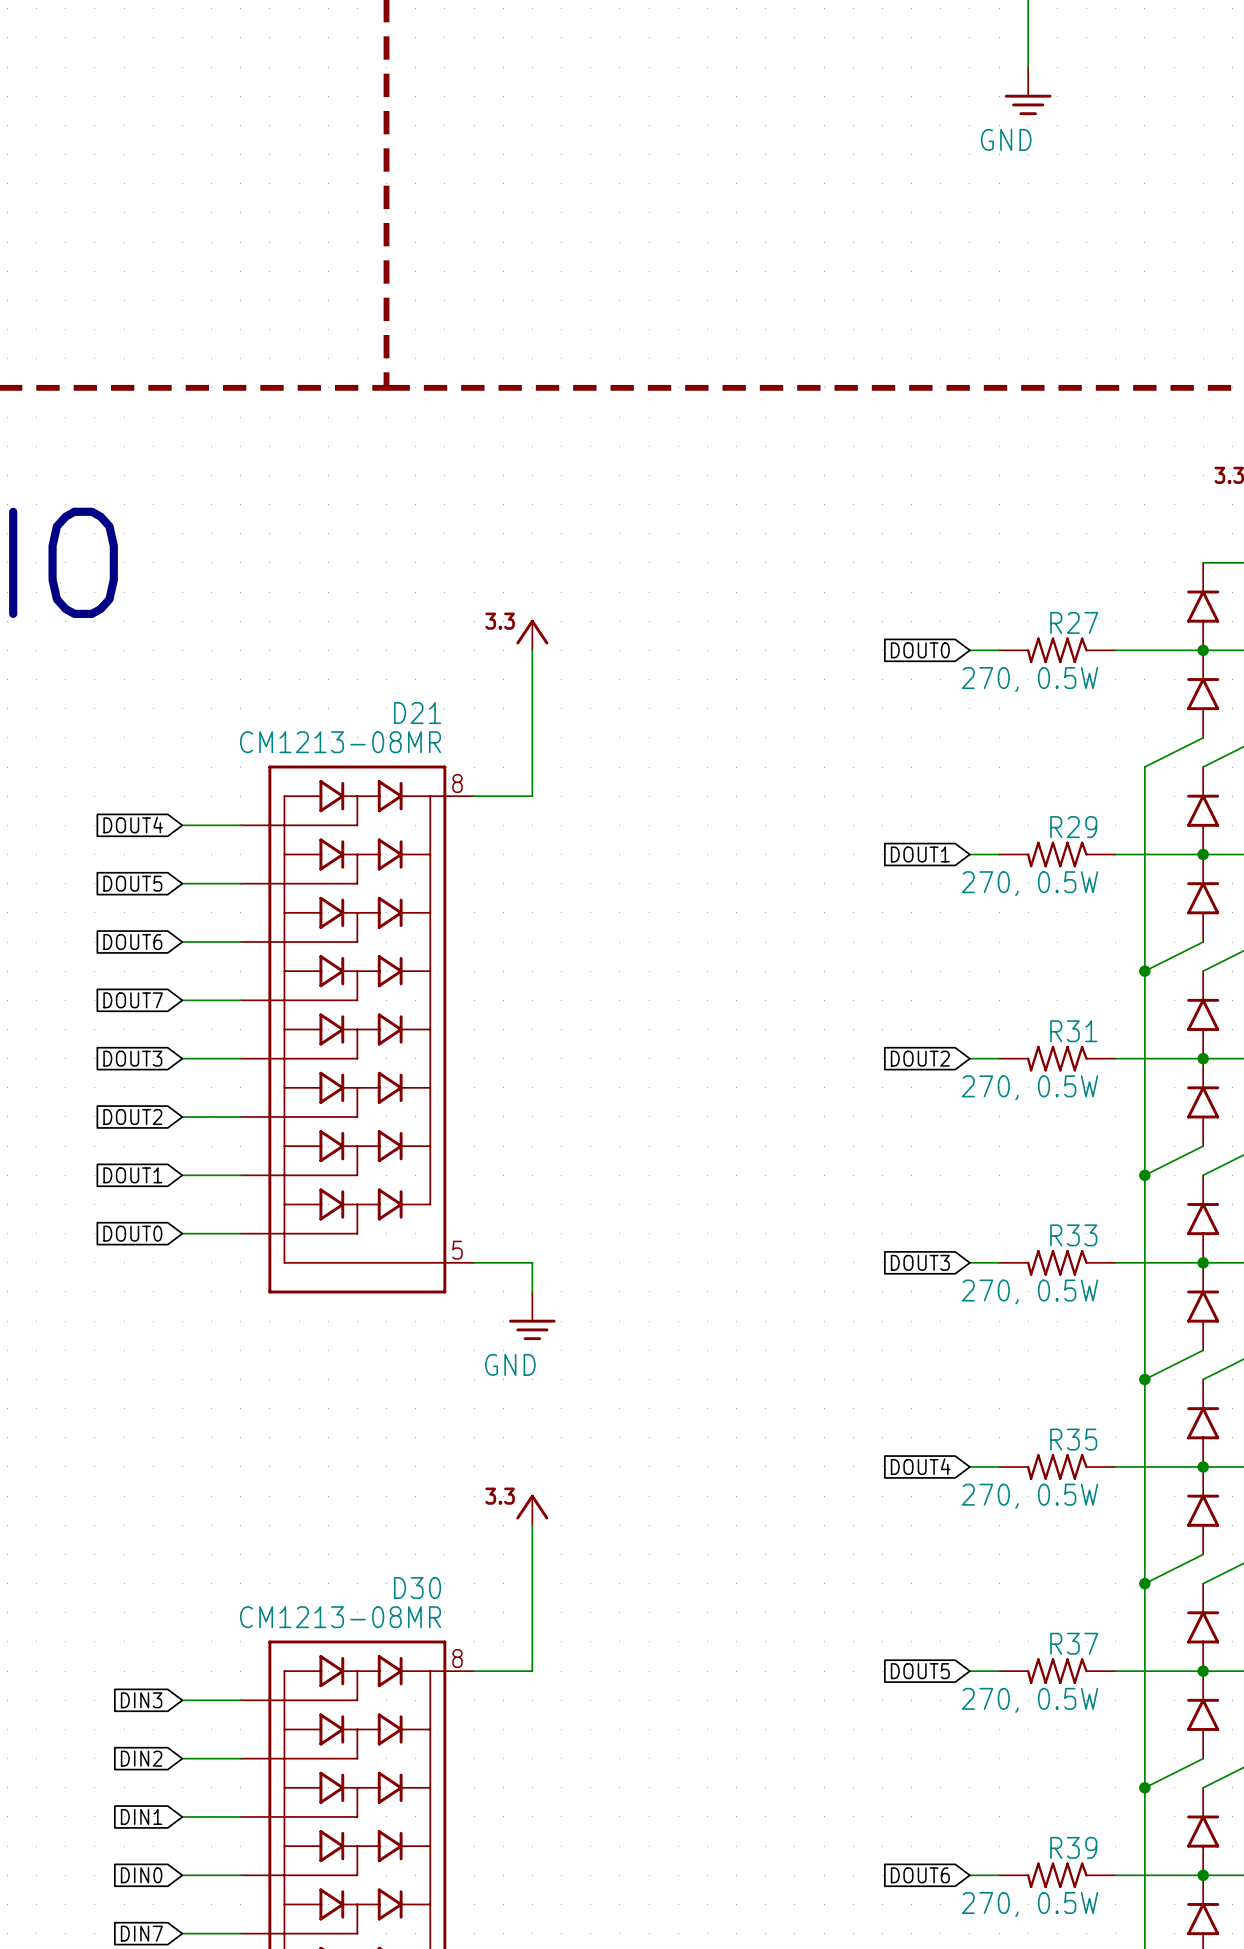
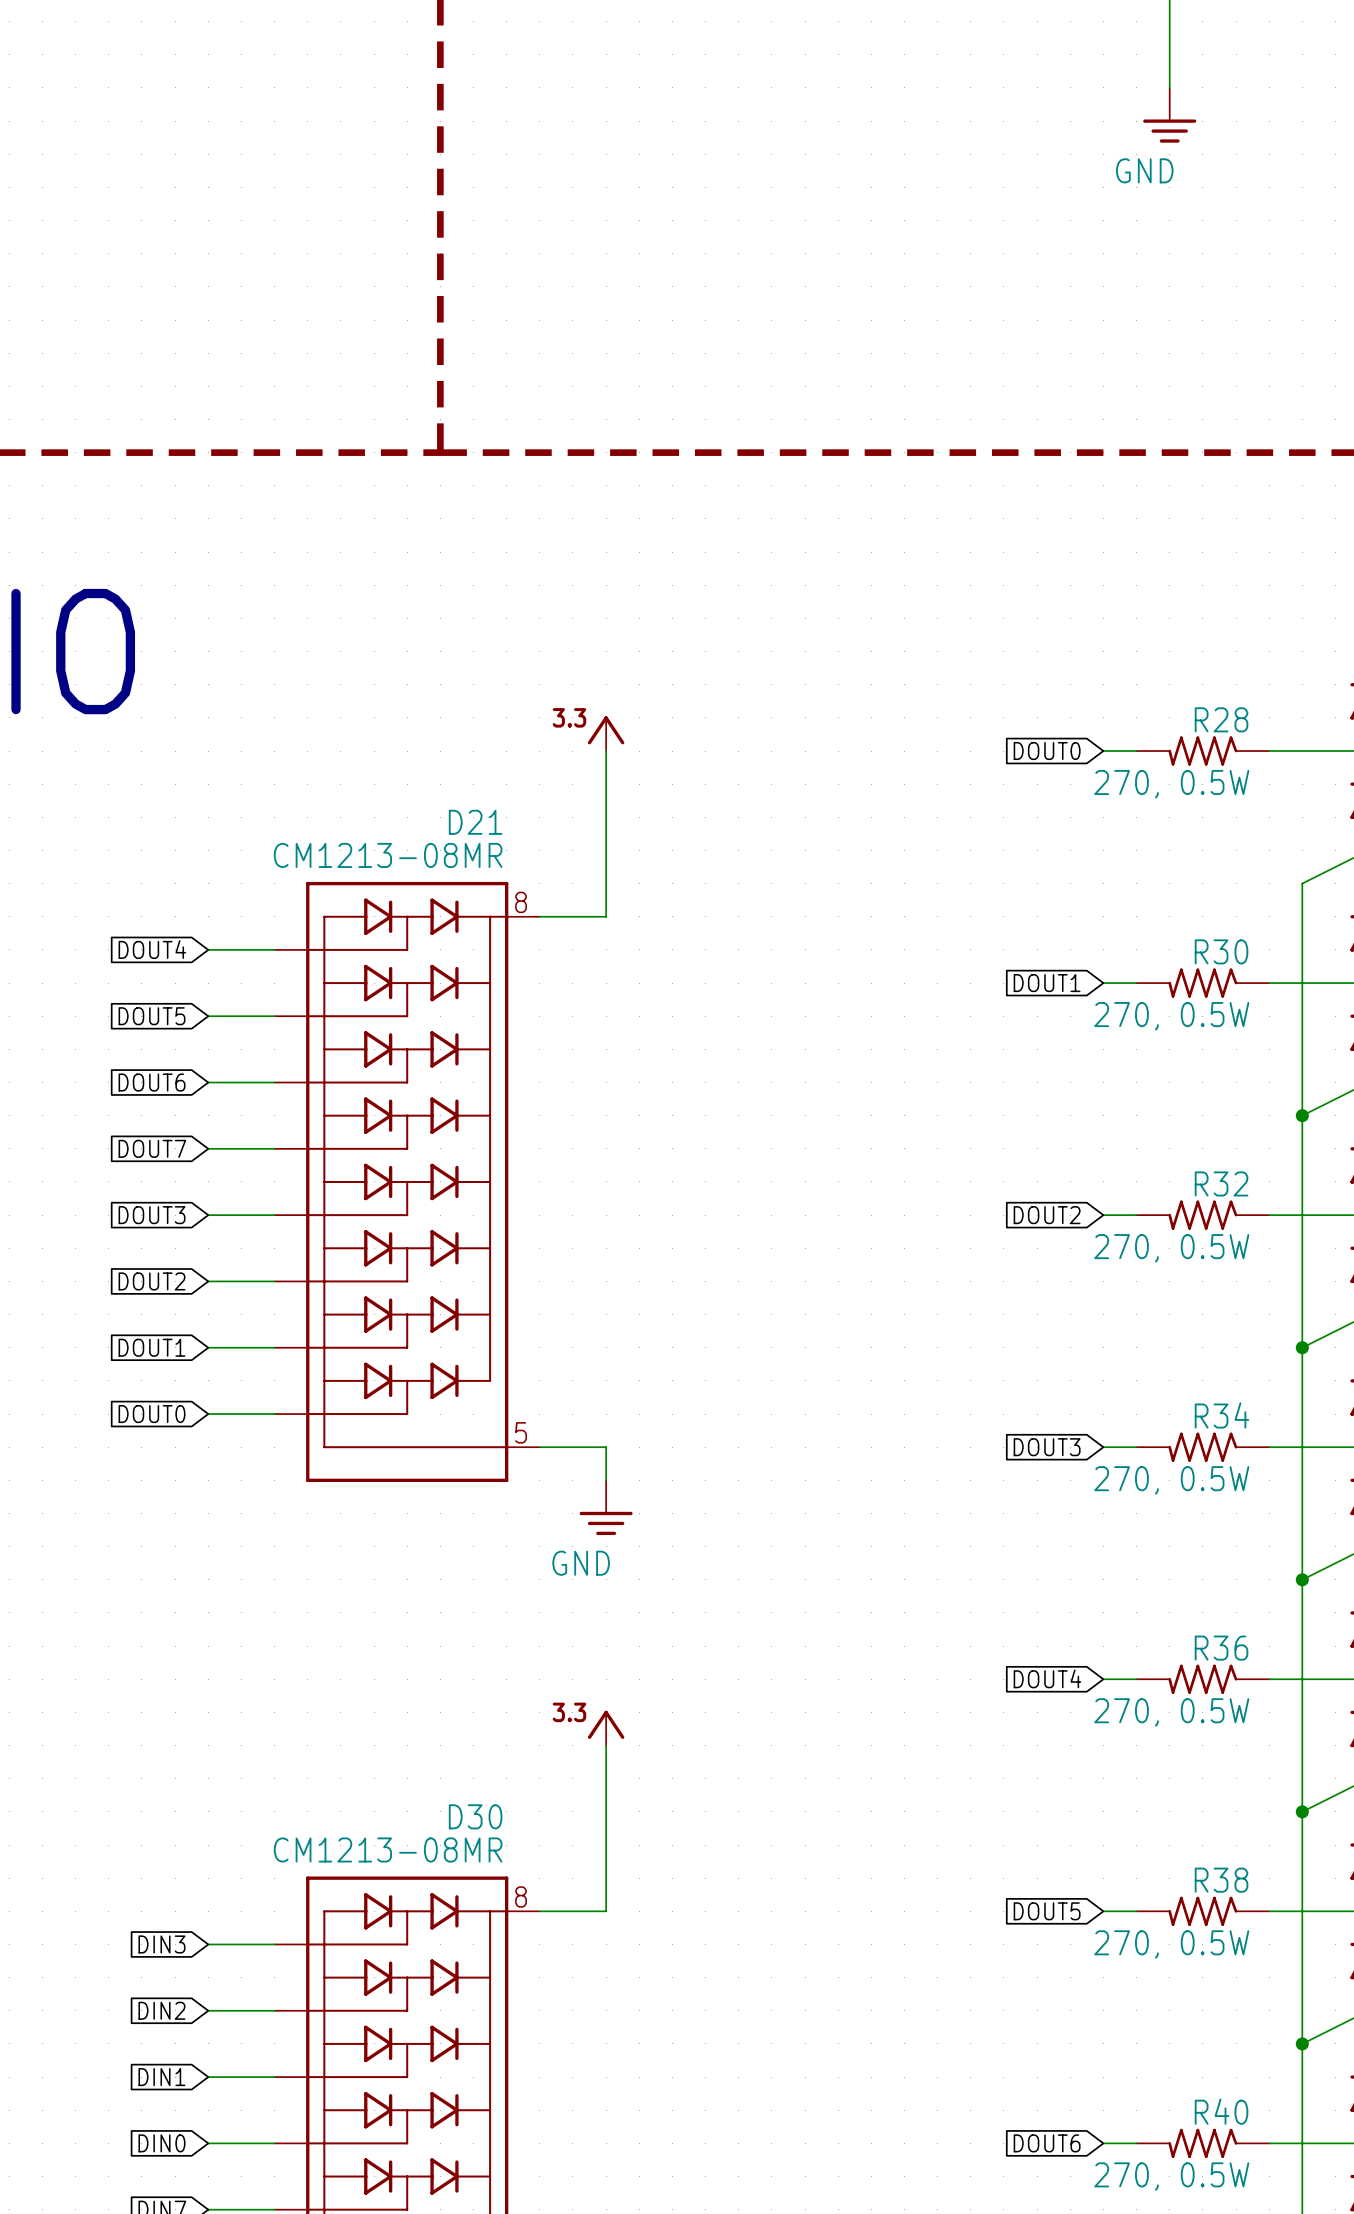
R27 name: R27 (1074, 622) -> R28 (1221, 719)
R29 name: R29 (1073, 827) -> R30 (1221, 951)
R31 name: R31 (1073, 1031) -> R32 (1221, 1183)
R33 name: R33 (1073, 1235) -> R34 (1222, 1415)
R35 name: R35 (1073, 1439) -> R36 (1221, 1648)
R37 name: R37 (1074, 1643) -> R38 (1221, 1880)
R39 name: R39 (1073, 1847) -> R40 (1221, 2111)

